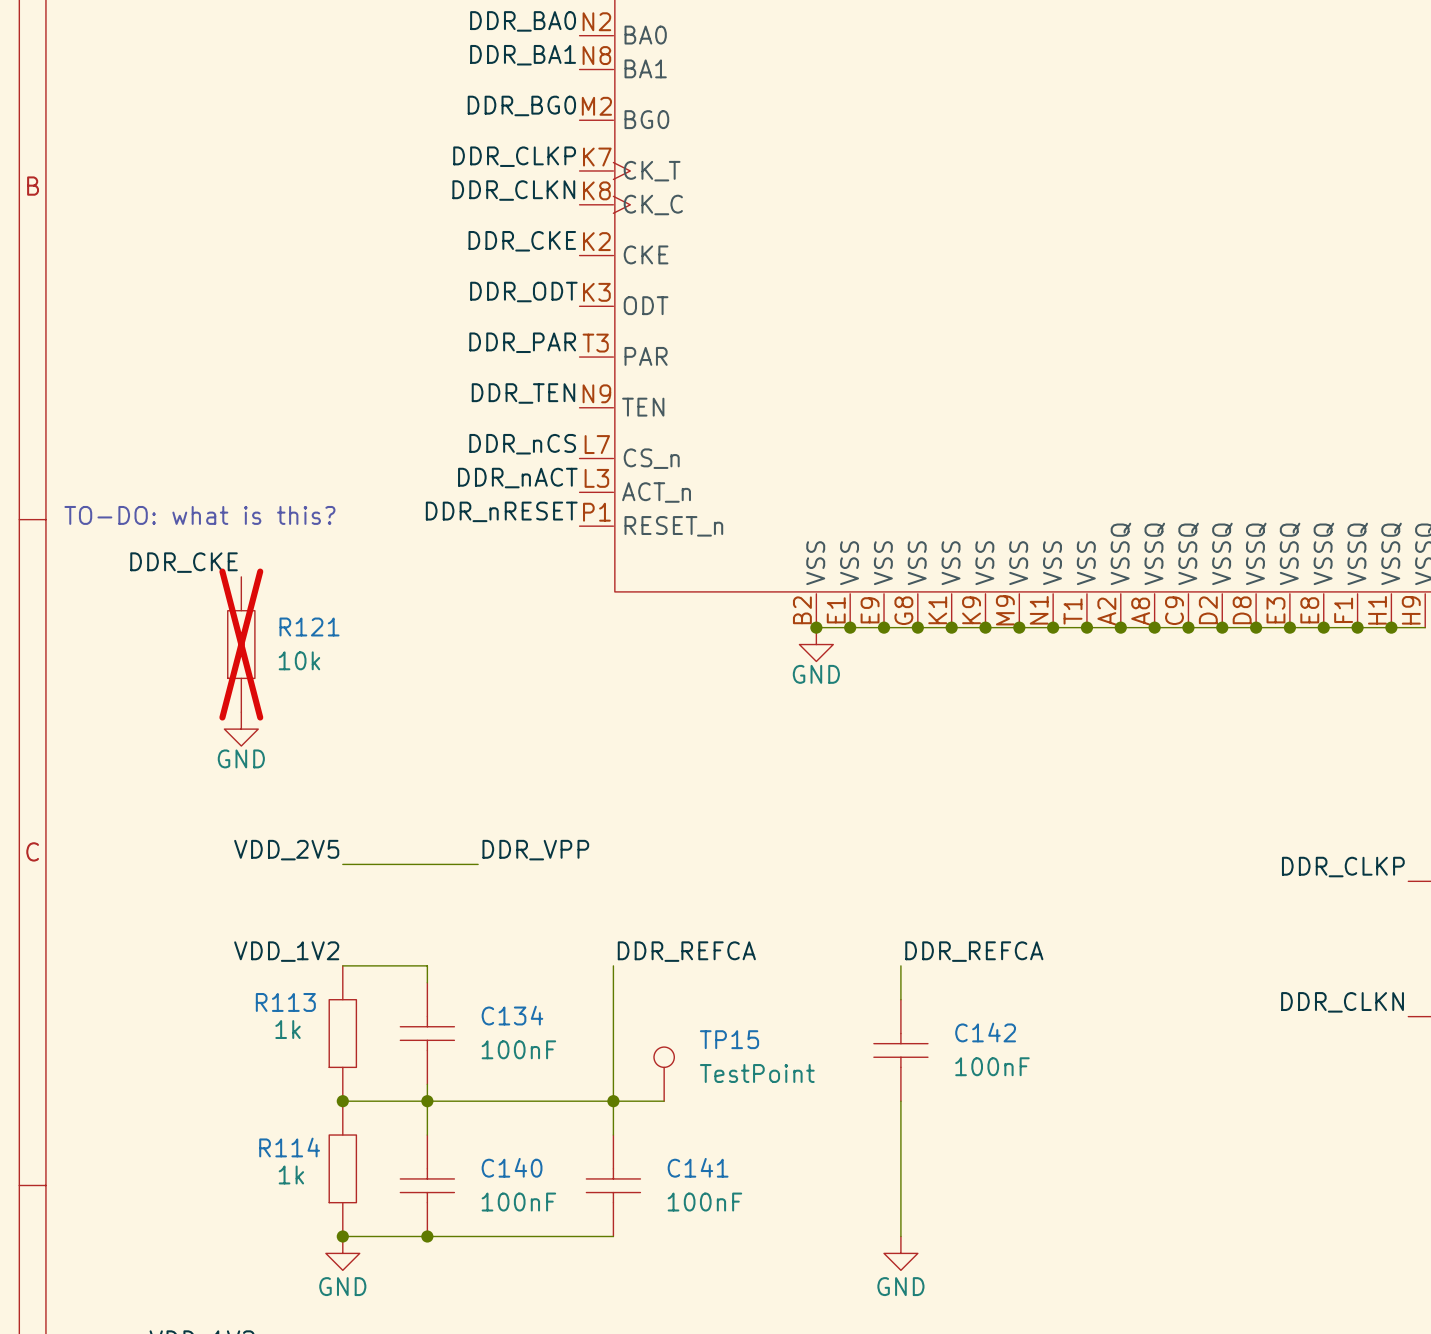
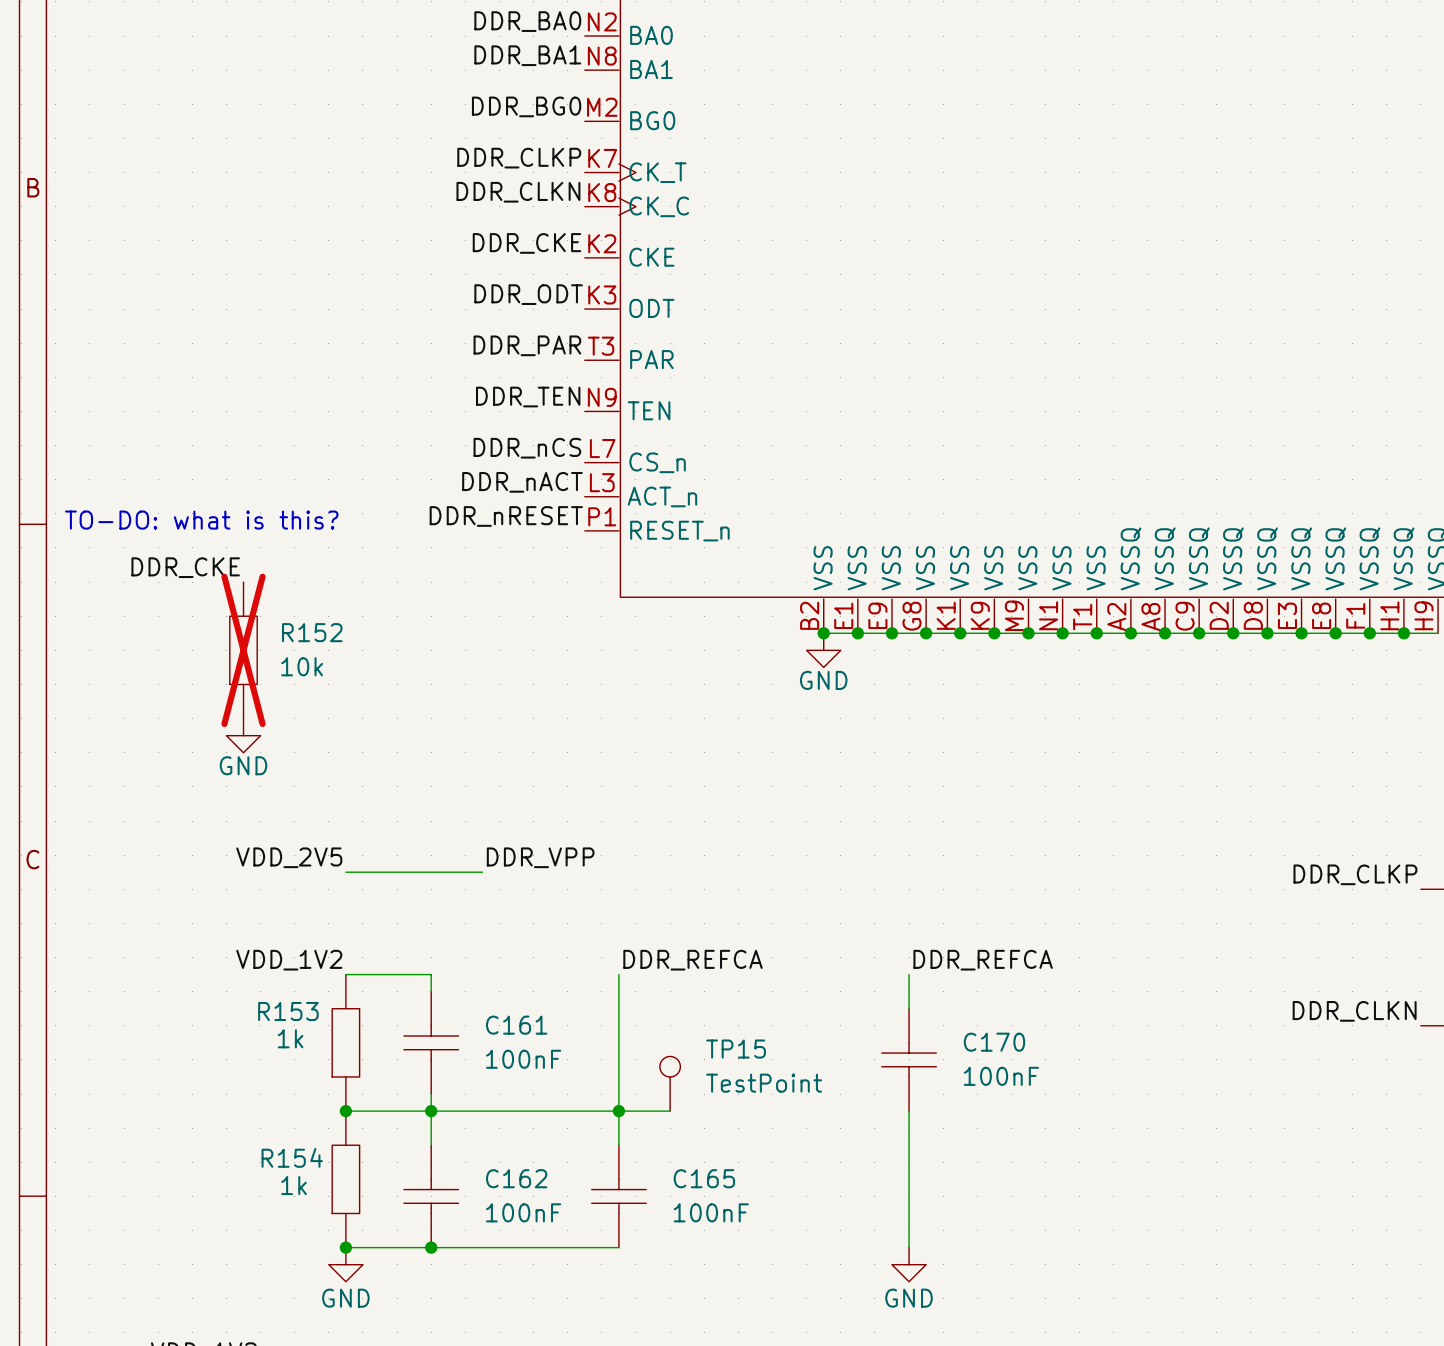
R121 name: R121 (309, 627) -> R152 (312, 632)
R113 name: R113 (285, 1002) -> R153 (288, 1011)
C134 name: C134 (512, 1015) -> C161 (516, 1025)
C142 name: C142 (985, 1032) -> C170 (994, 1042)
R114 name: R114 (289, 1147) -> R154 (292, 1157)
C140 name: C140 (512, 1167) -> C162 (516, 1178)
C141 name: C141 (698, 1167) -> C165 (704, 1178)

